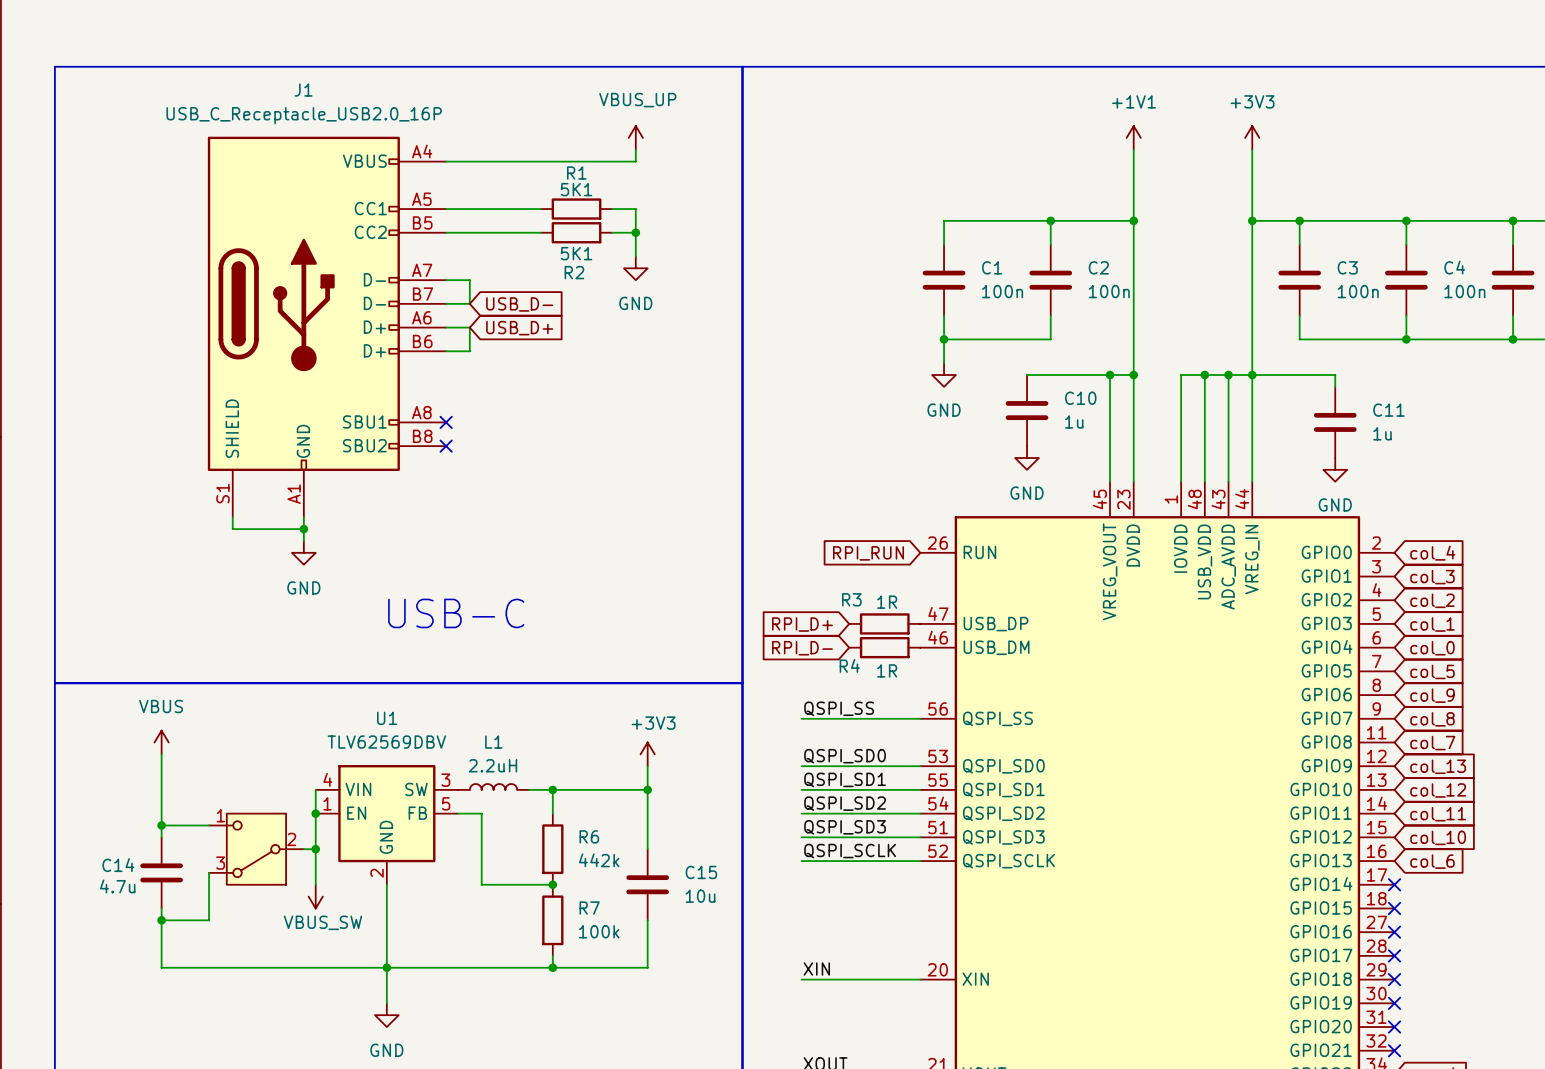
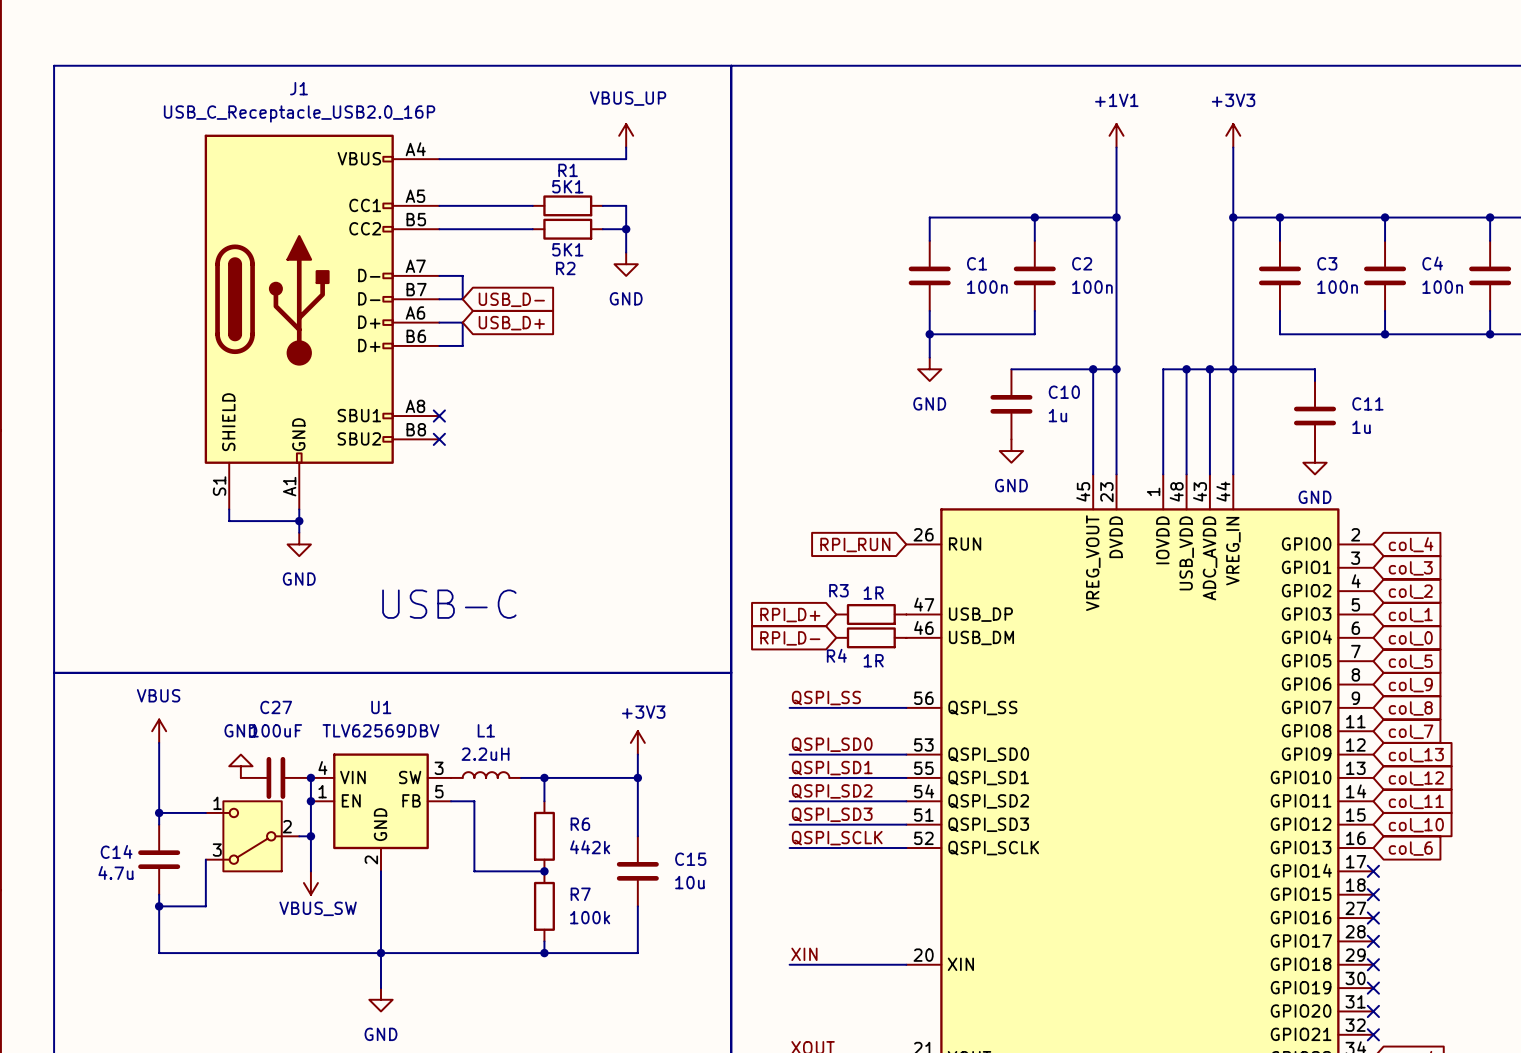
power symbol: none -> GND (240, 766)
C27: none -> 100uF (275, 777)
junction: none -> (310, 777)

